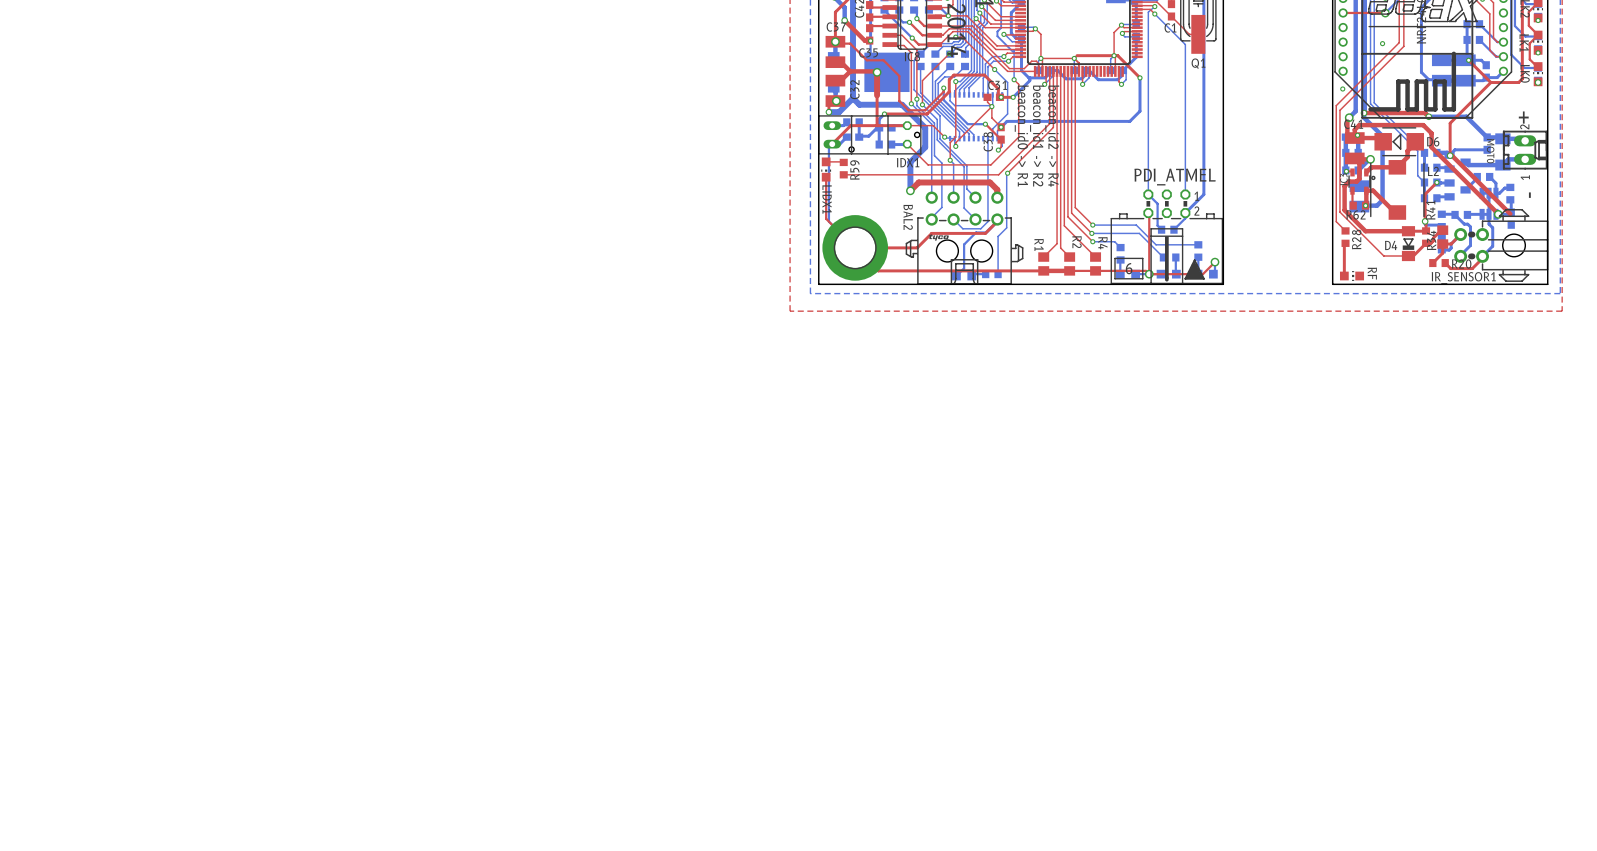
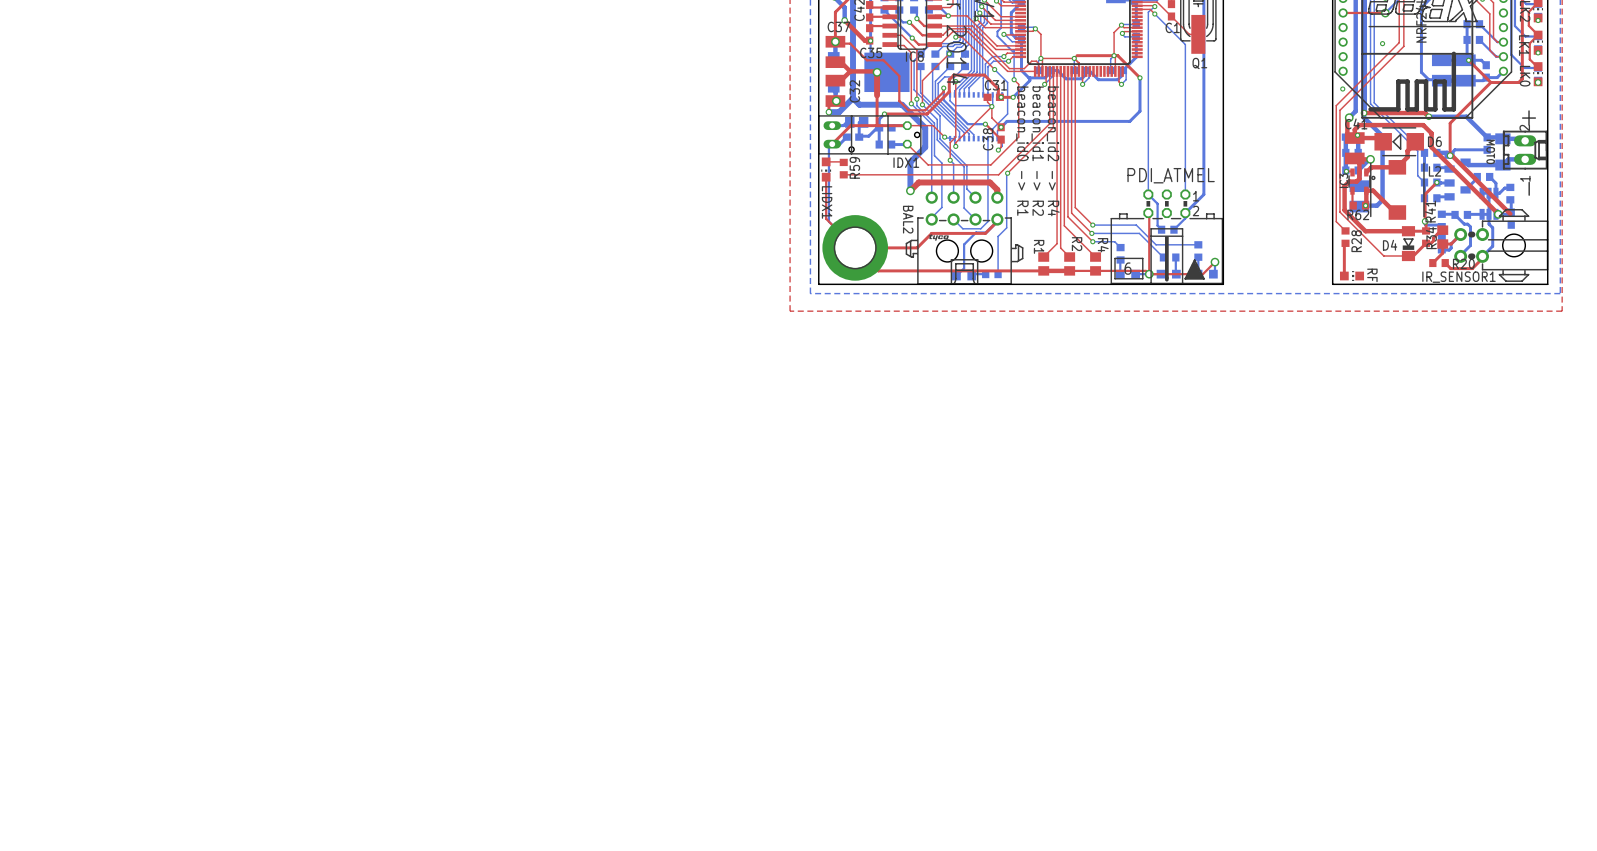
part footprint: [843, 118, 863, 127] -> [845, 116, 869, 128]

